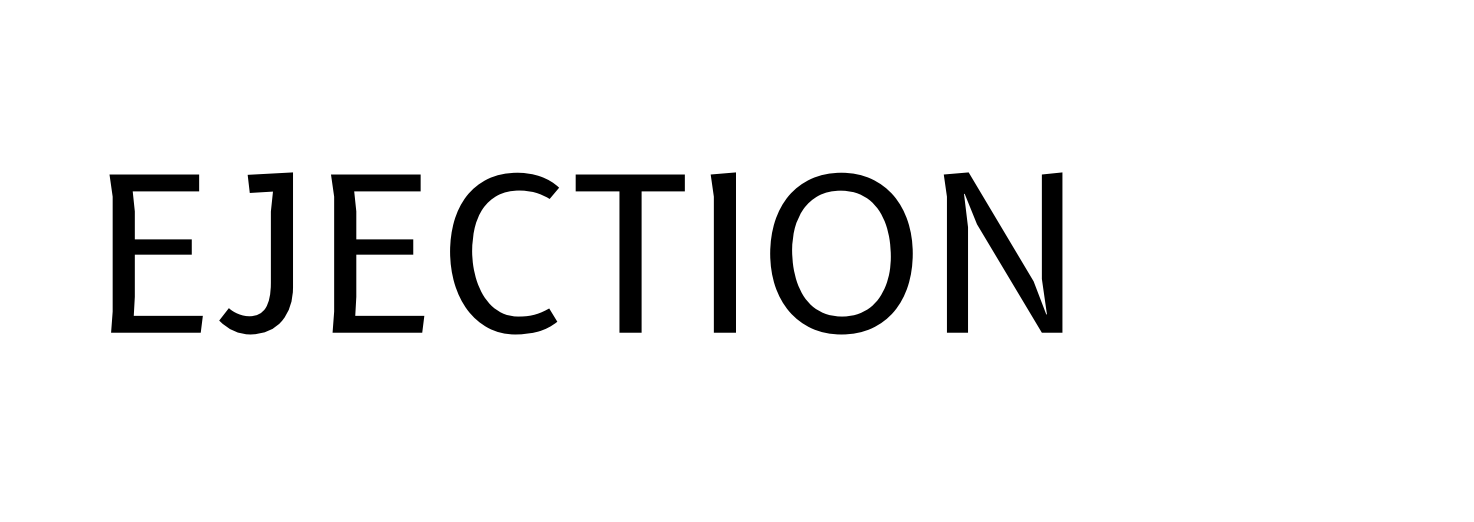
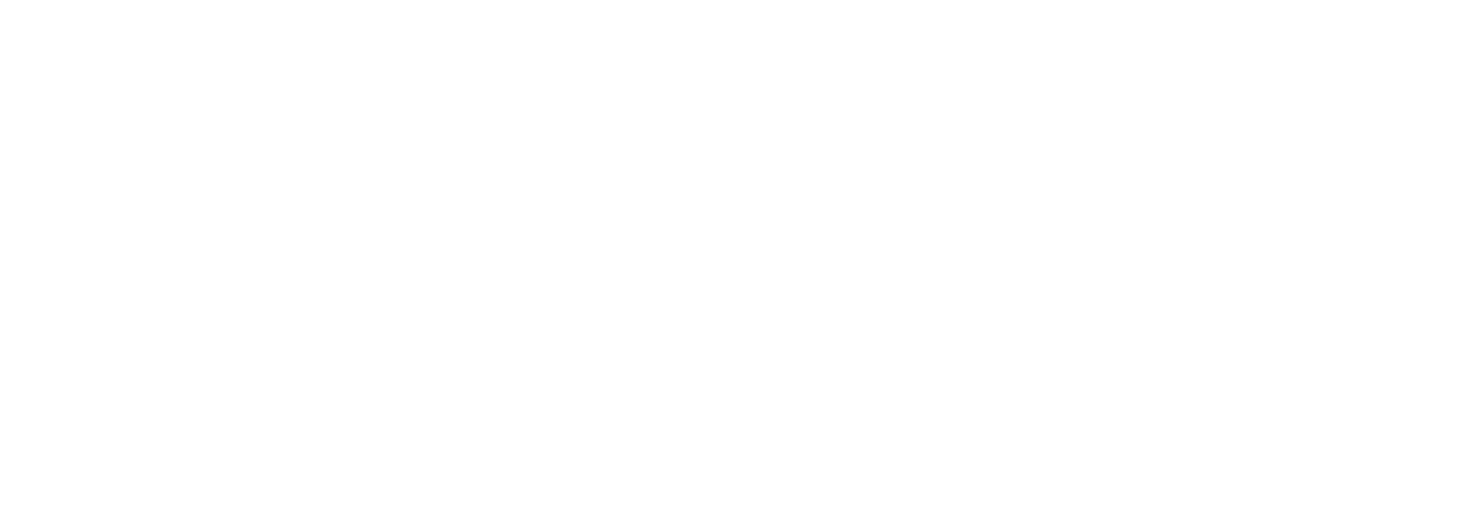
text: EJECTION (585, 253) -> none

